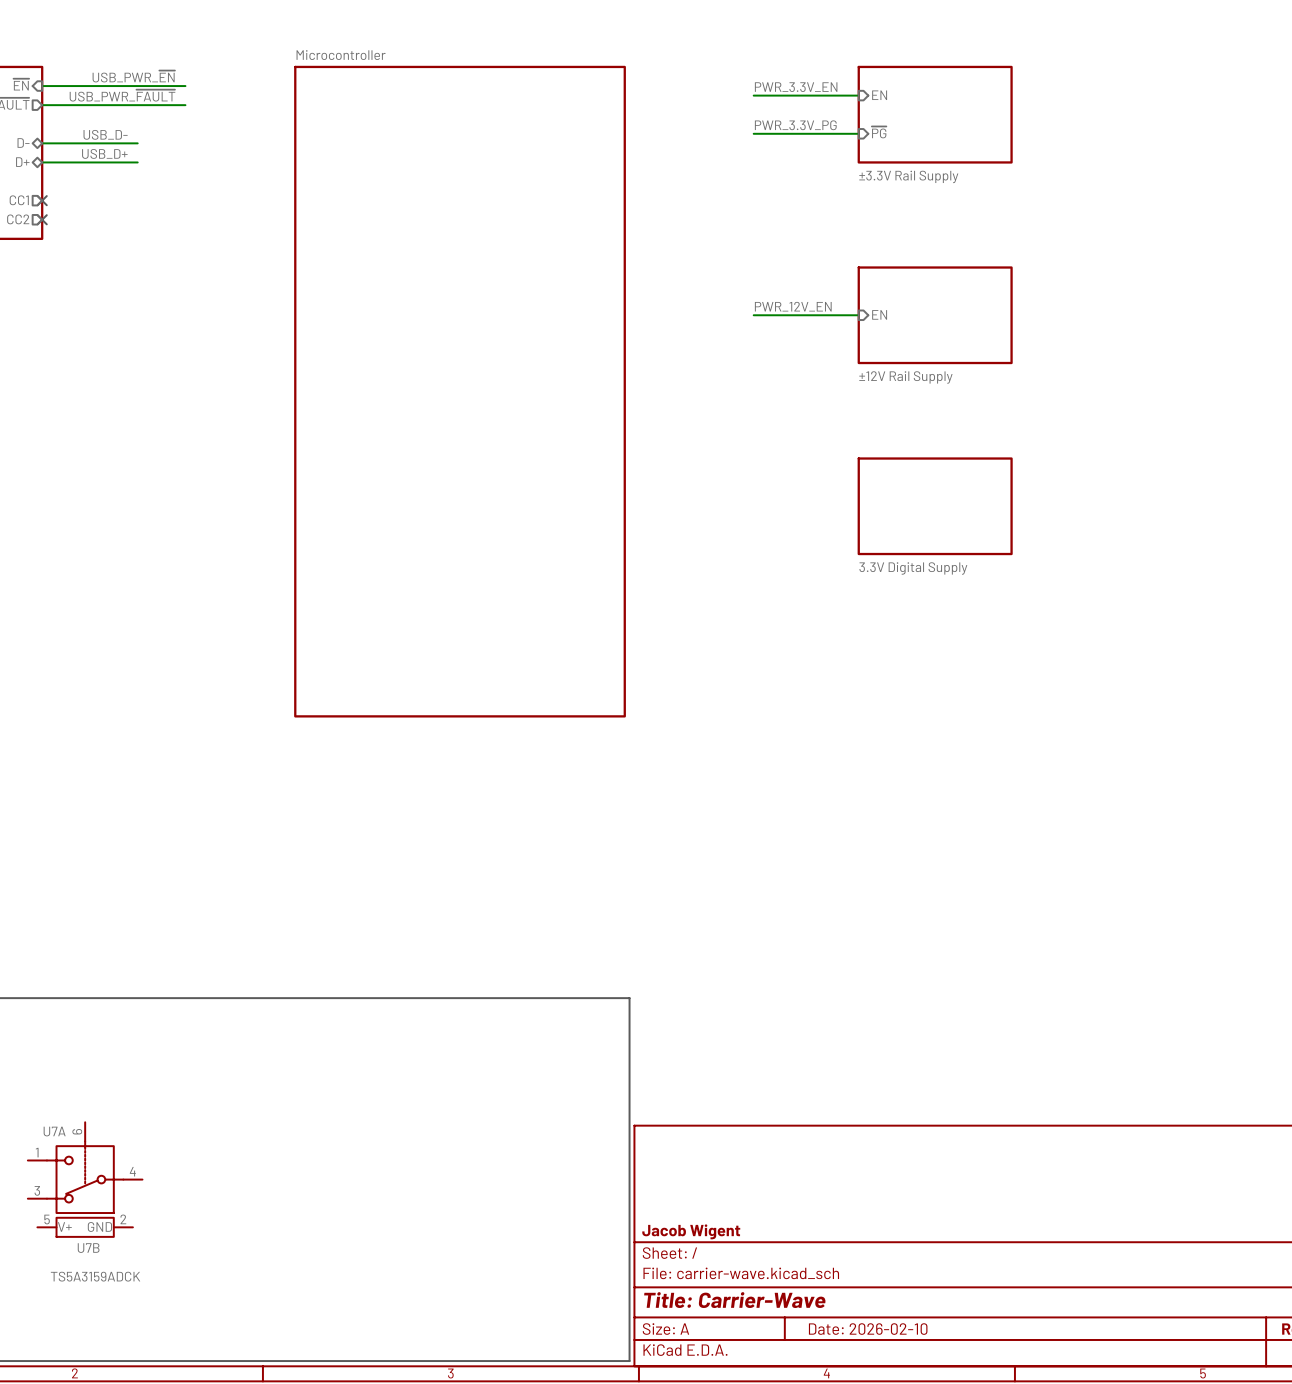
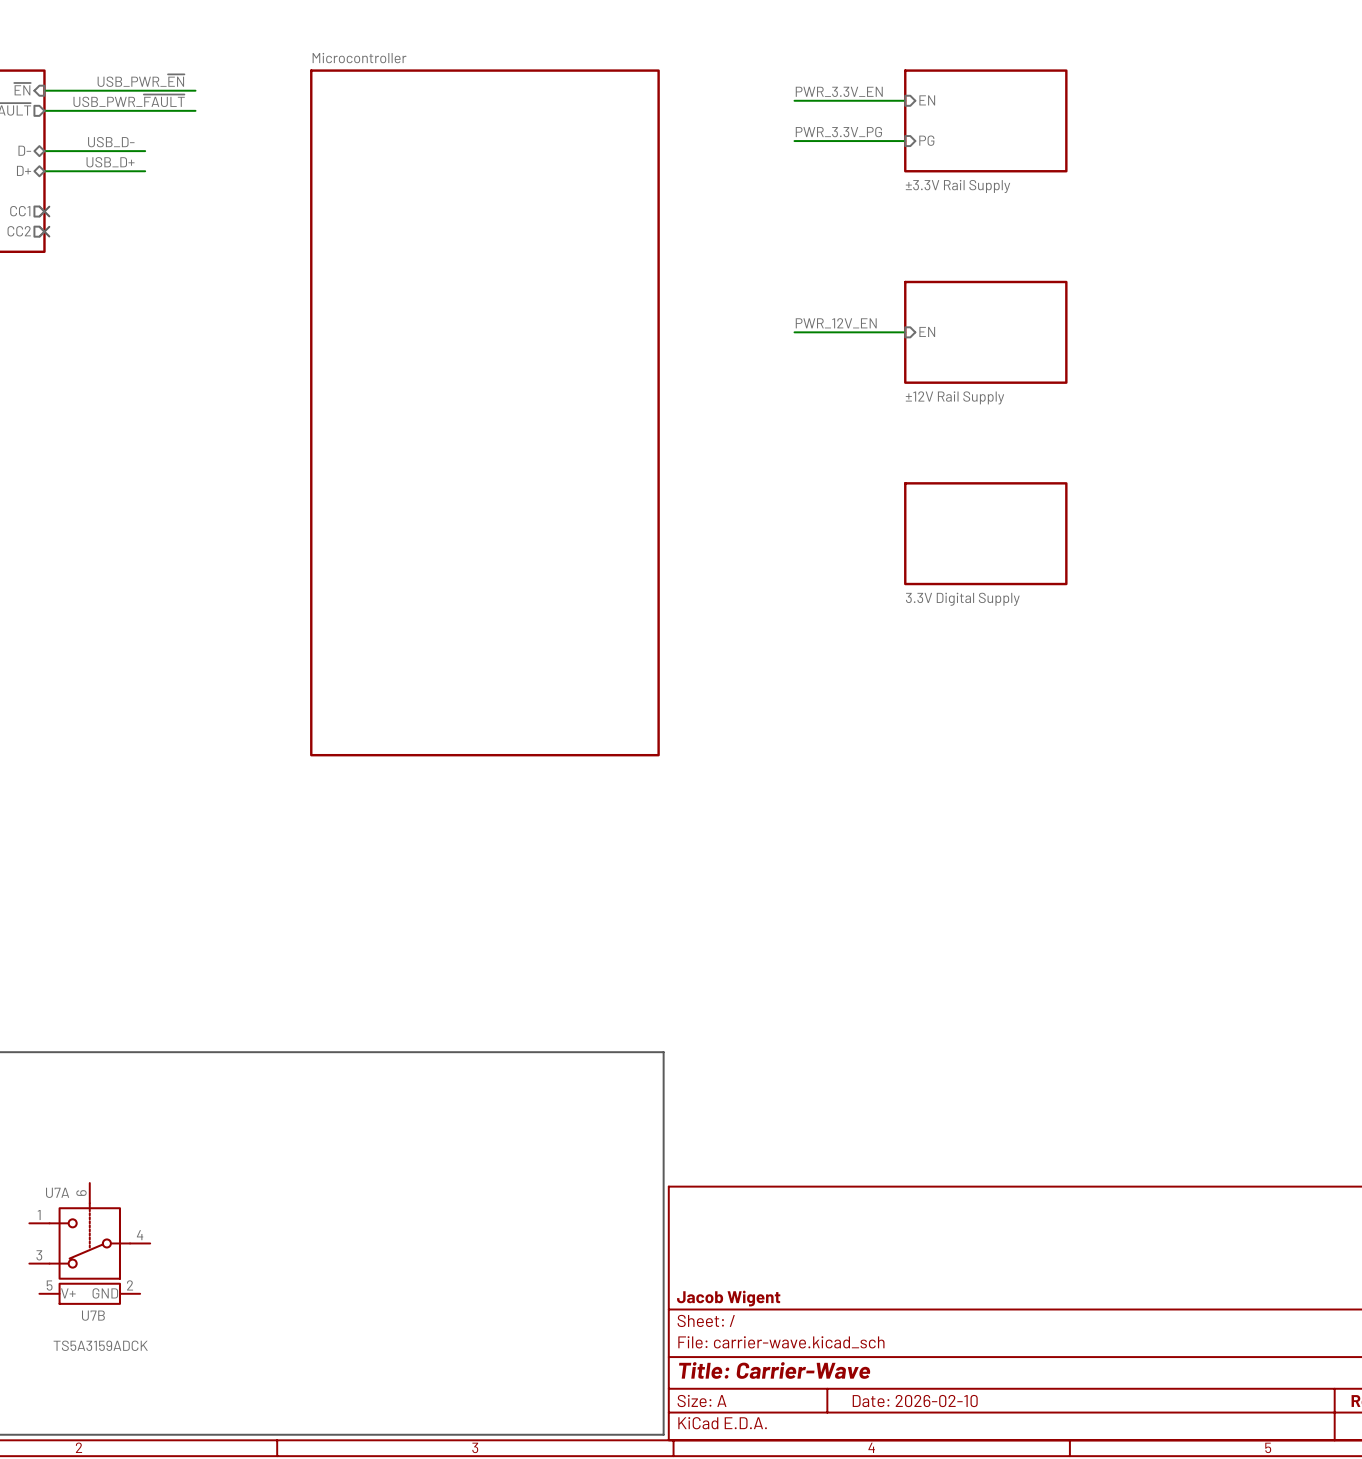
sheet pin: ~{PG} (879, 132) -> PG (926, 140)

